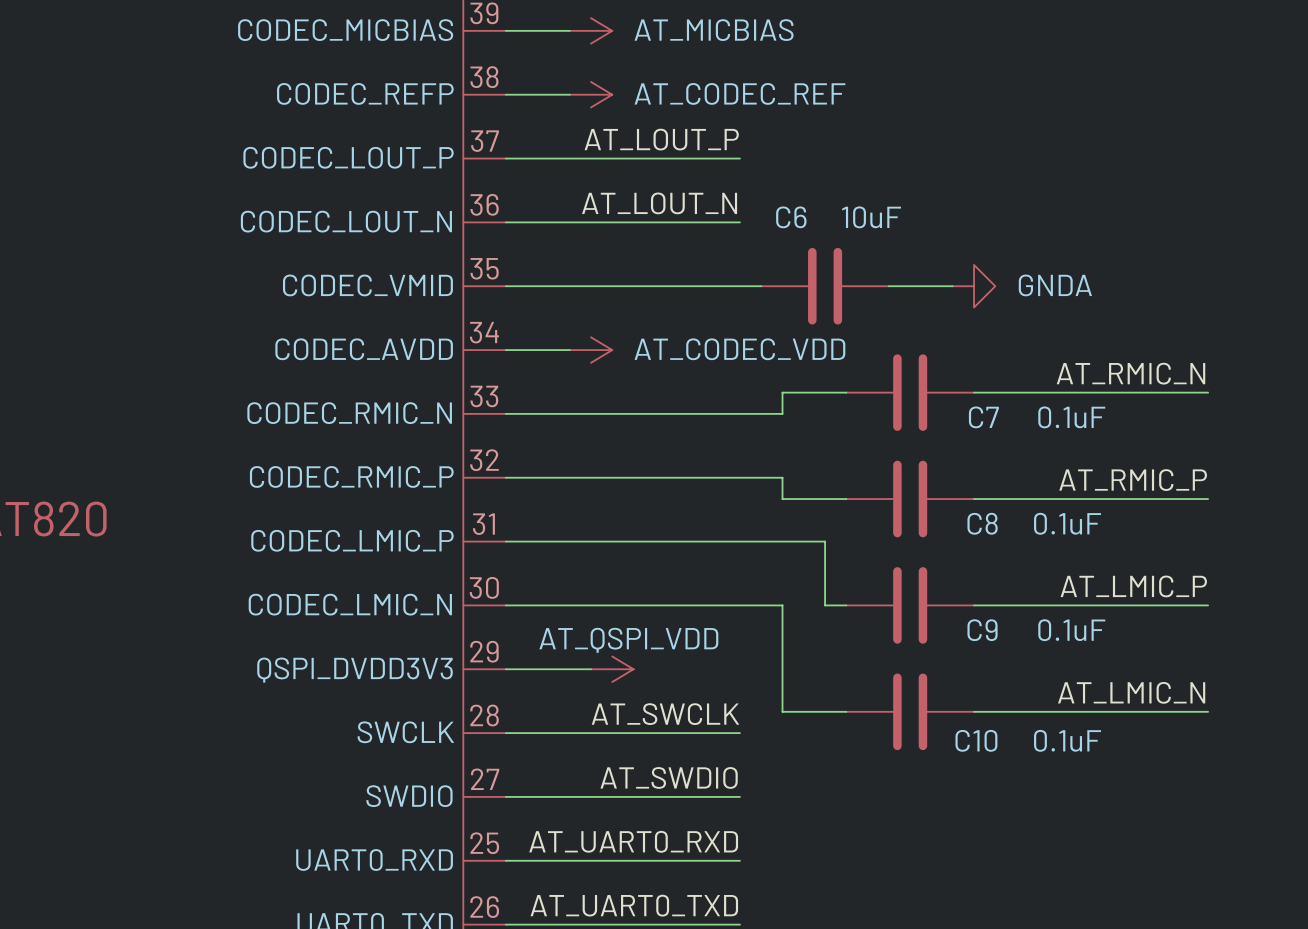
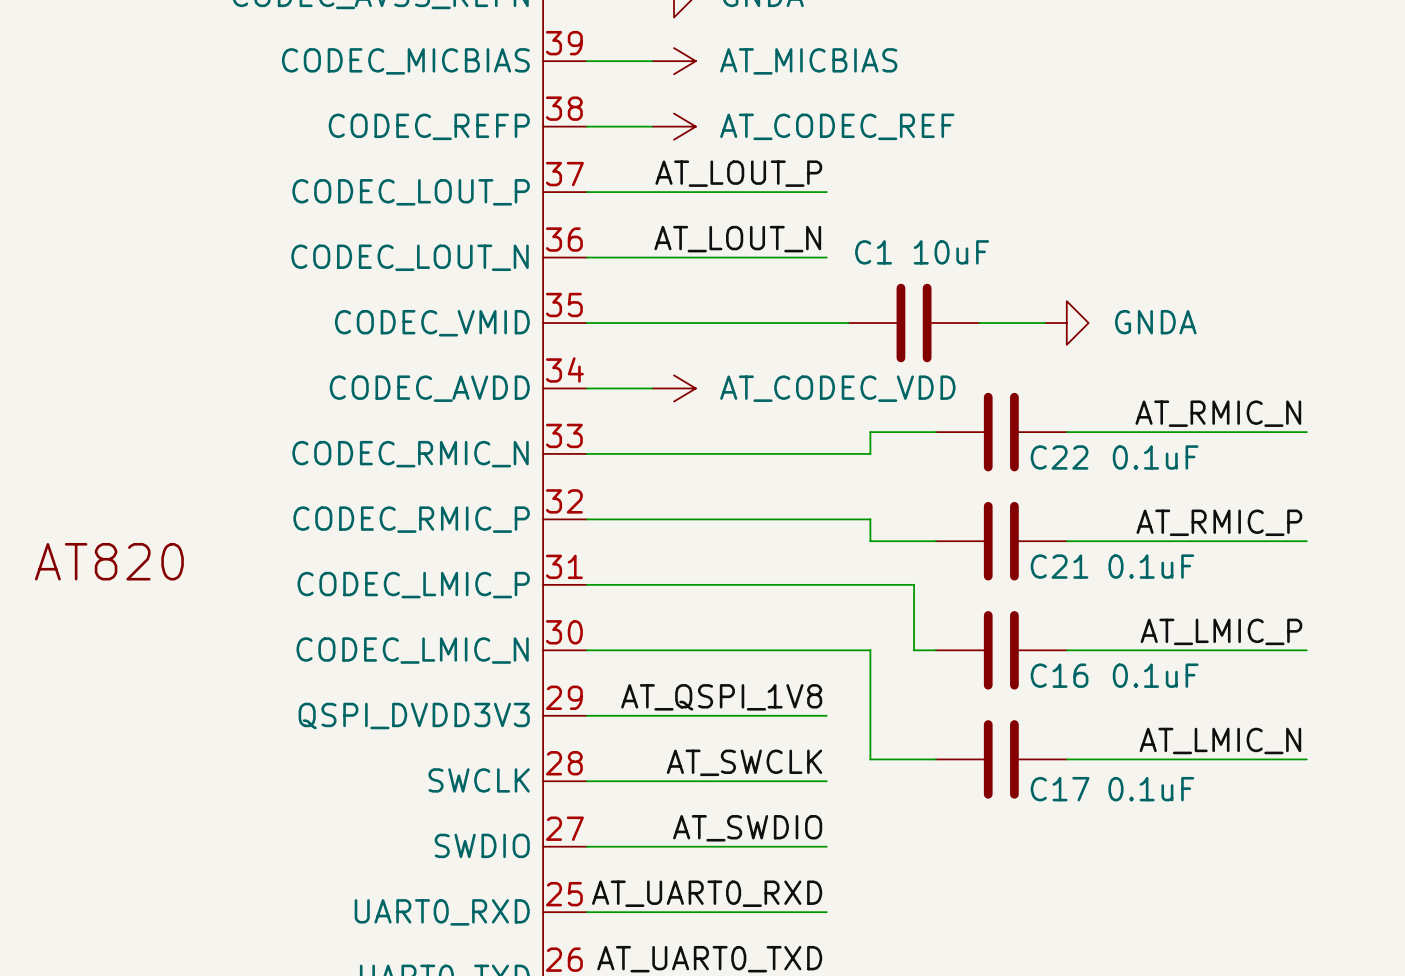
C6 name: C6 (791, 217) -> C1 (873, 252)
C7 name: C7 (983, 417) -> C22 (1059, 457)
C8 name: C8 (982, 523) -> C21 (1059, 566)
C9 name: C9 (982, 630) -> C16 (1059, 675)
label: none -> AT_QSPI_1V8 (721, 697)
wire: none -> (674, 715) (826, 715)
power symbol: AT_QSPI_VDD (612, 669) -> none
C10 name: C10 (976, 740) -> C17 (1060, 789)

